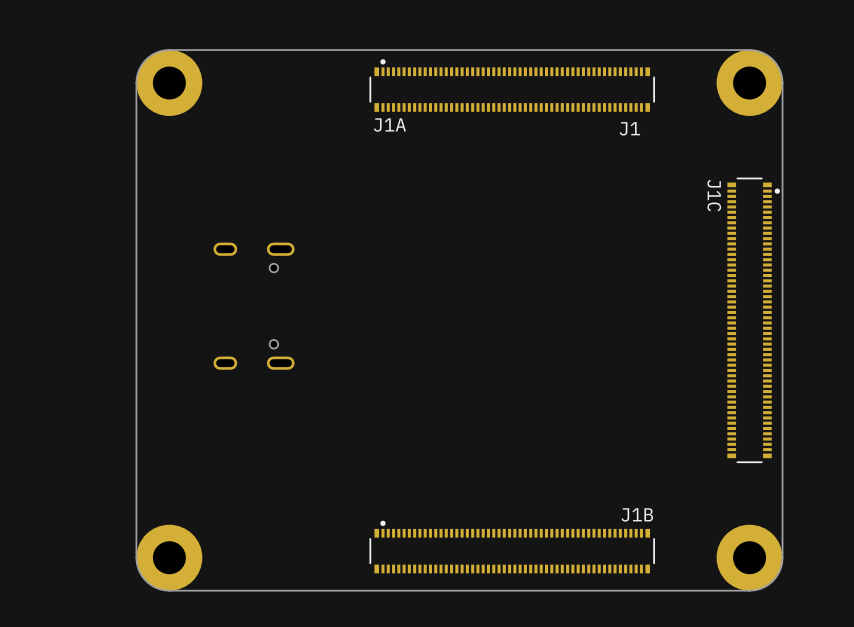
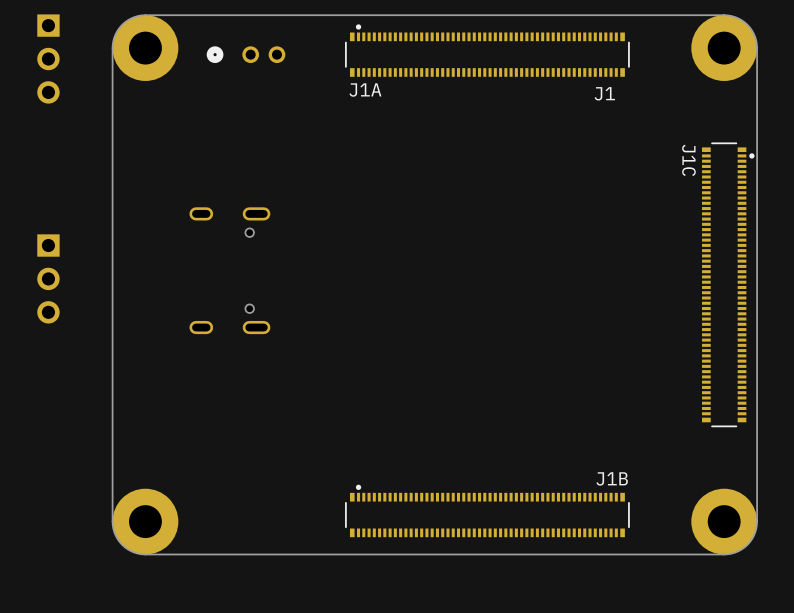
part: none -> (246, 54)
part: none -> (48, 59)
part: none -> (48, 278)

